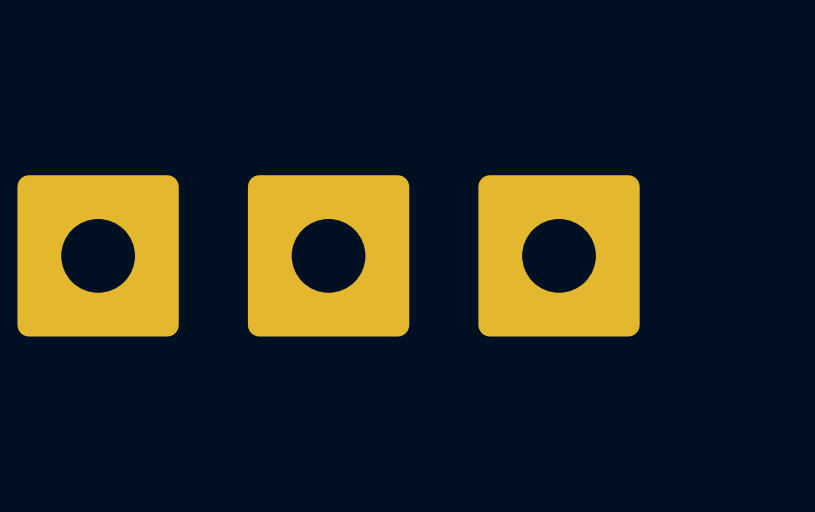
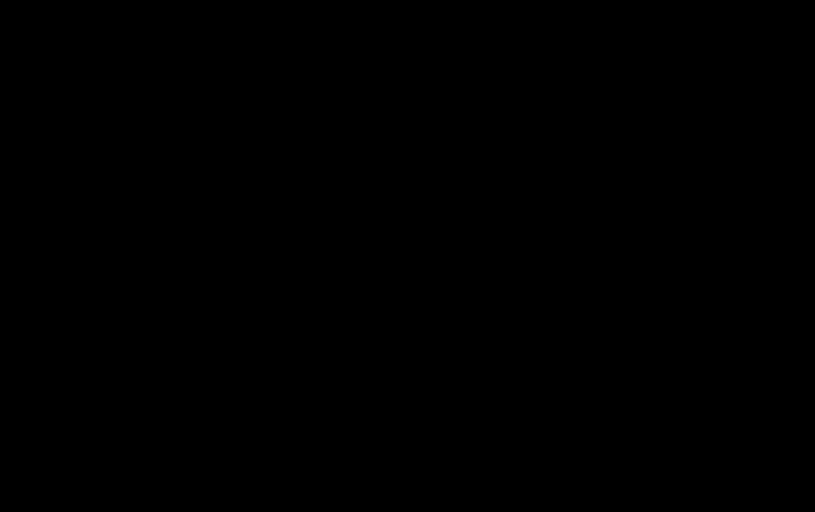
part: (98, 255) -> none
part: (328, 255) -> none
part: (559, 255) -> none

